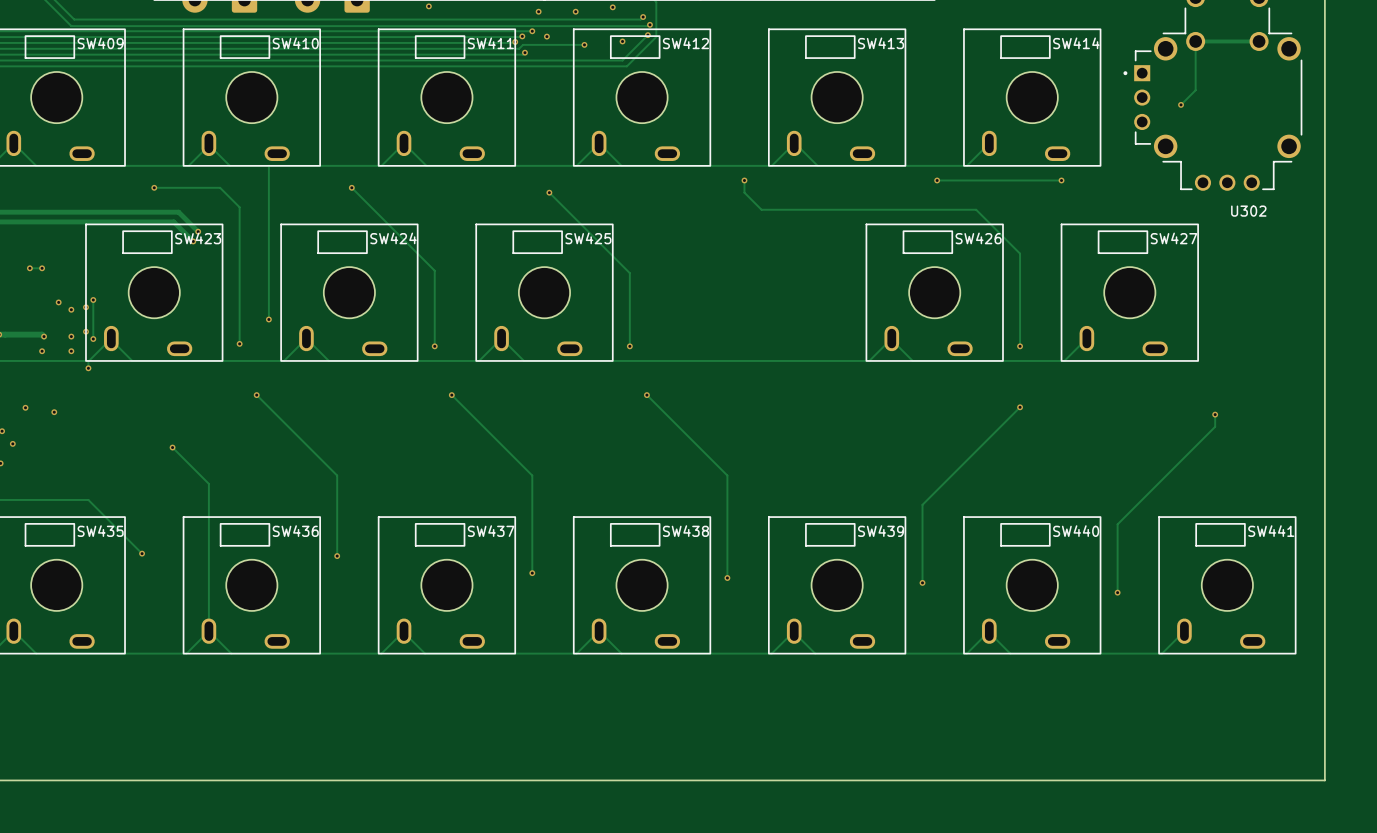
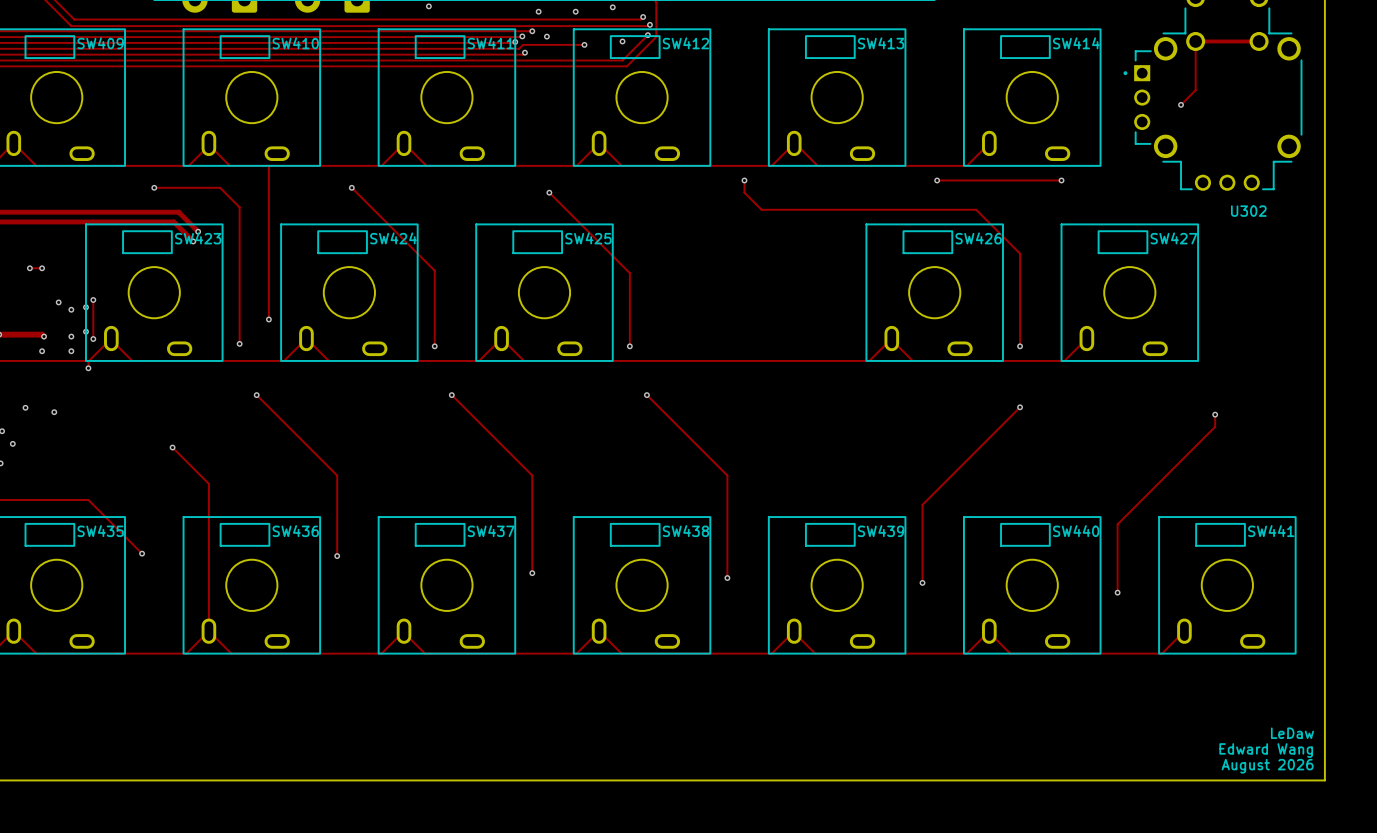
text: none -> LeDaw (1292, 733)
text: none -> Edward Wang (1266, 750)
text: none -> August 2026 (1267, 766)

